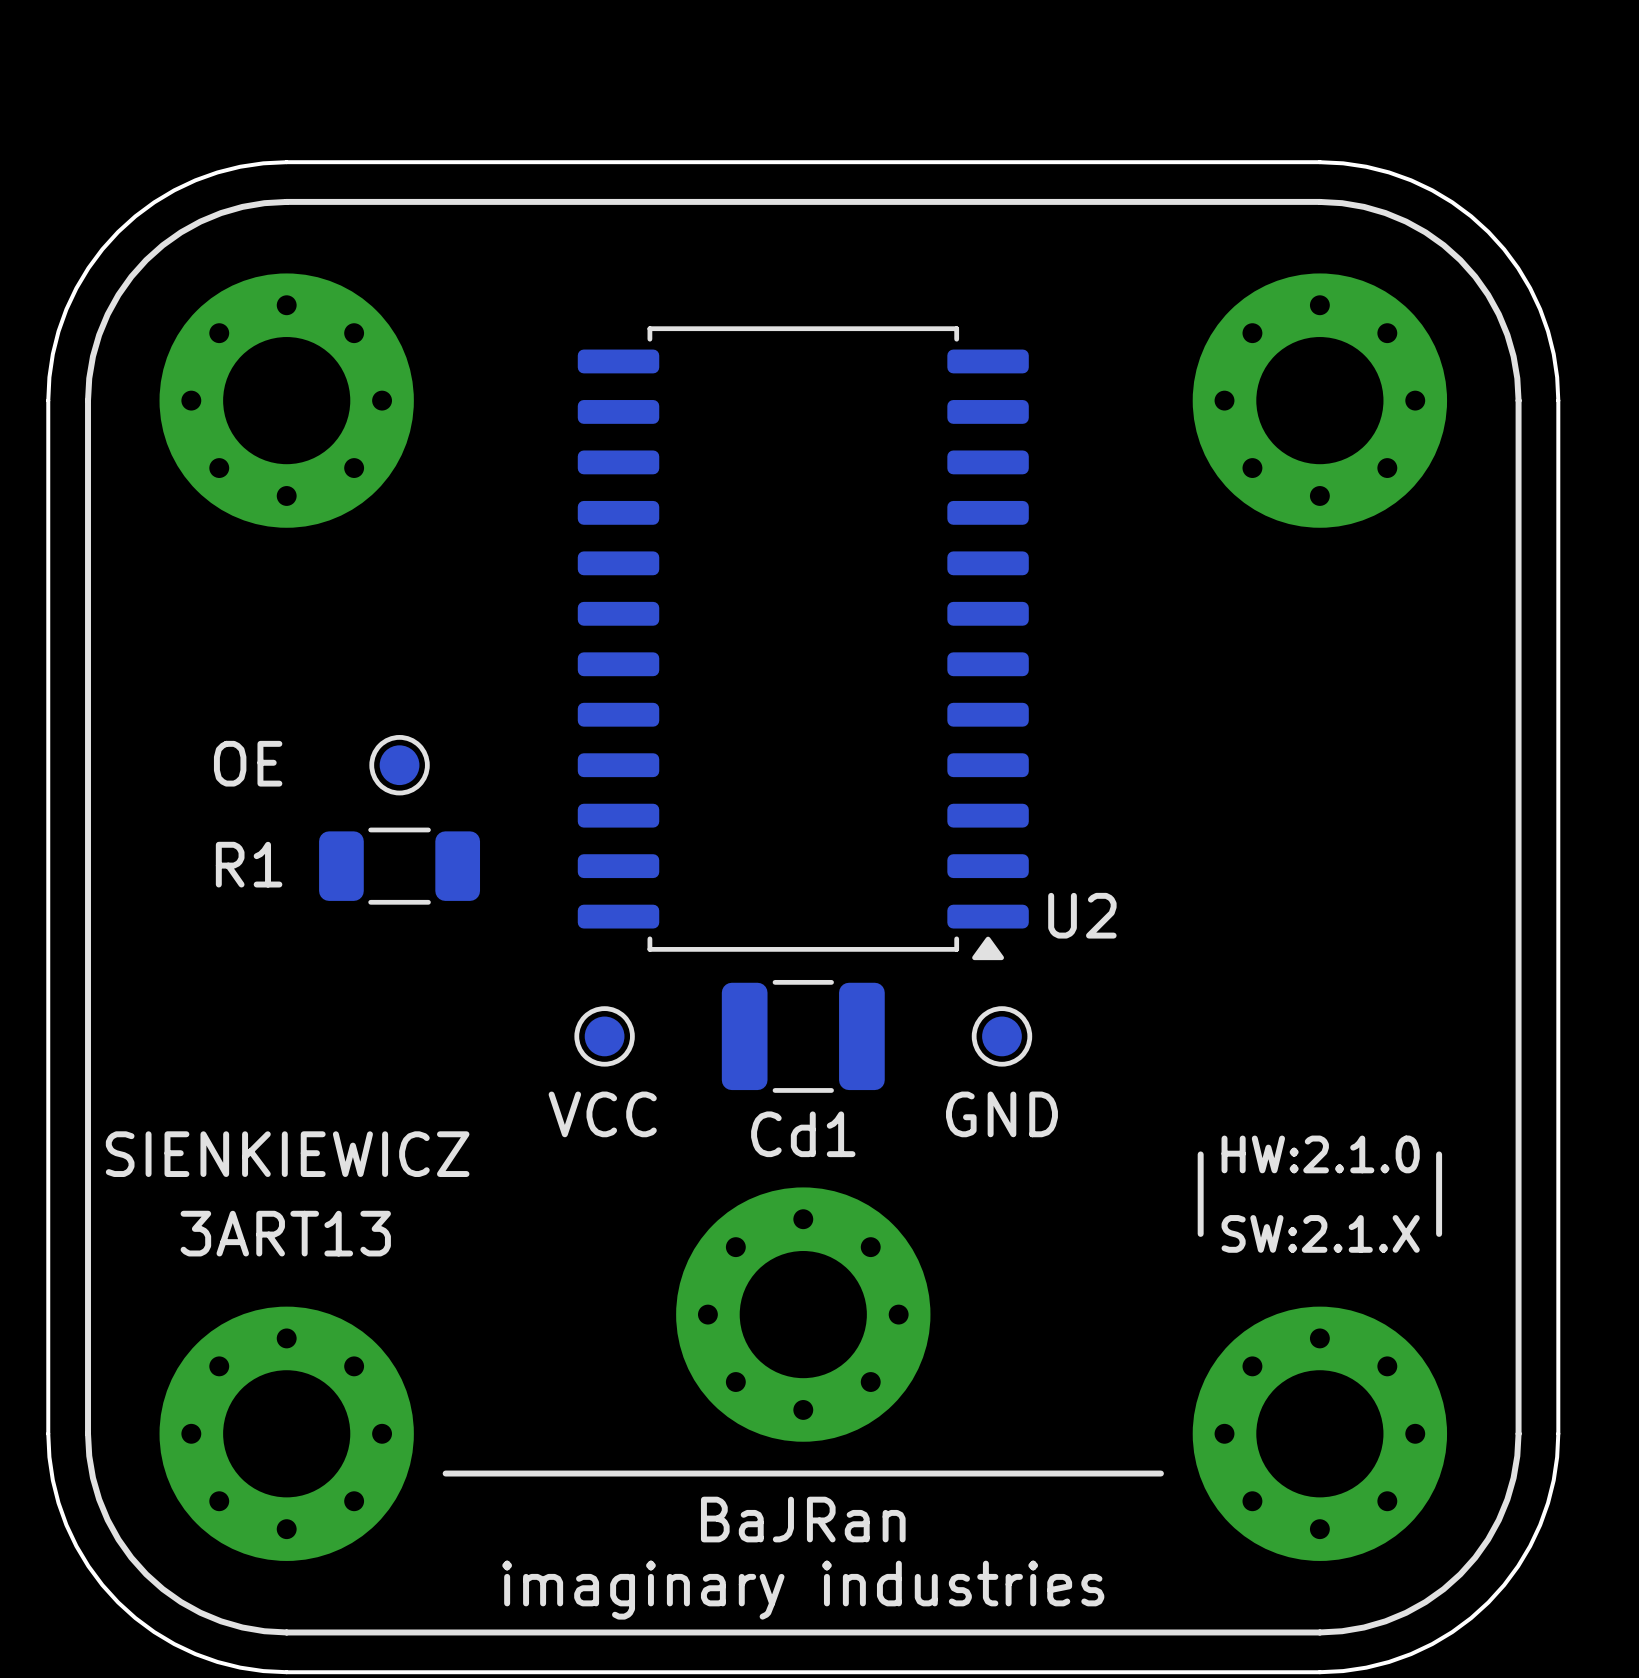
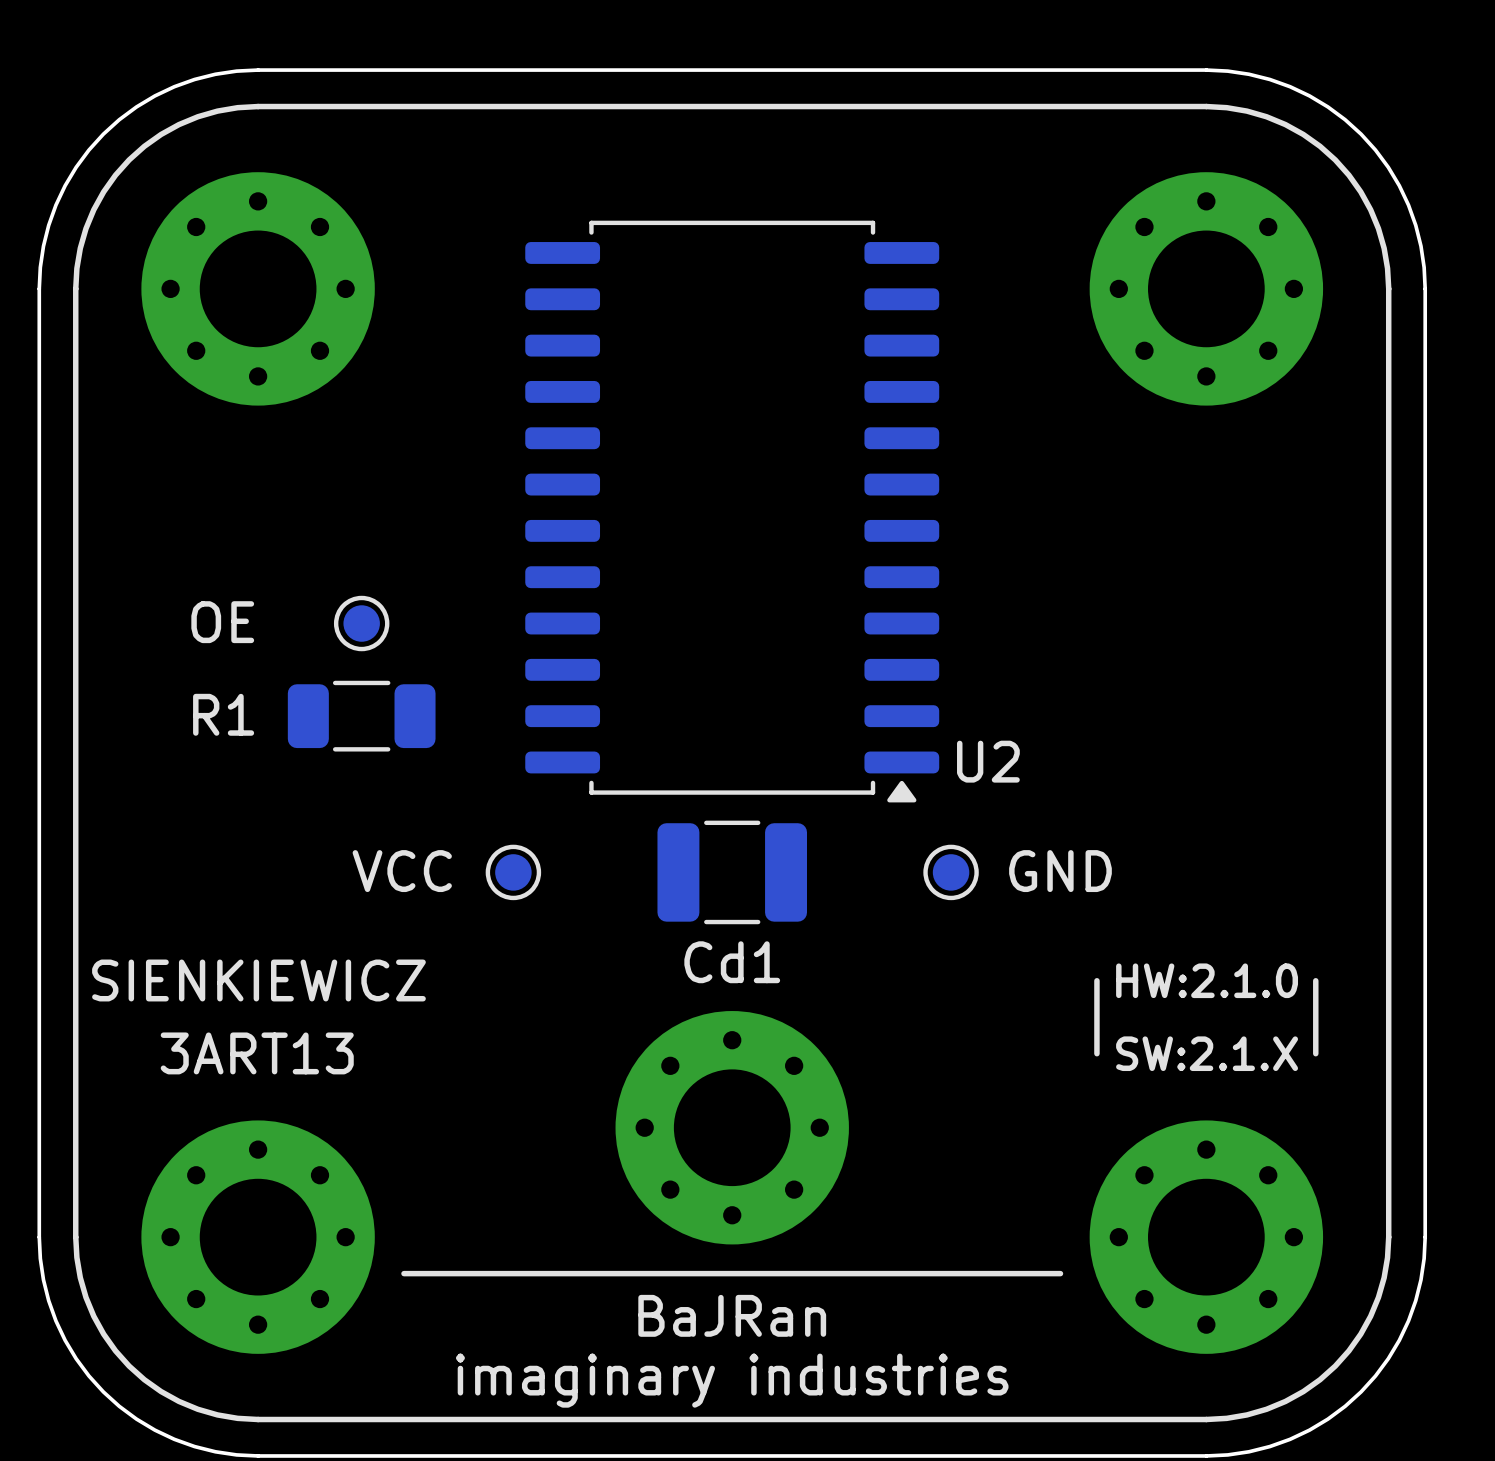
part position: (604, 1036) -> (513, 872)
part position: (1001, 1036) -> (951, 872)
part value position: VCC (602, 1114) -> VCC (402, 871)
part value position: GND (1001, 1114) -> GND (1060, 871)

